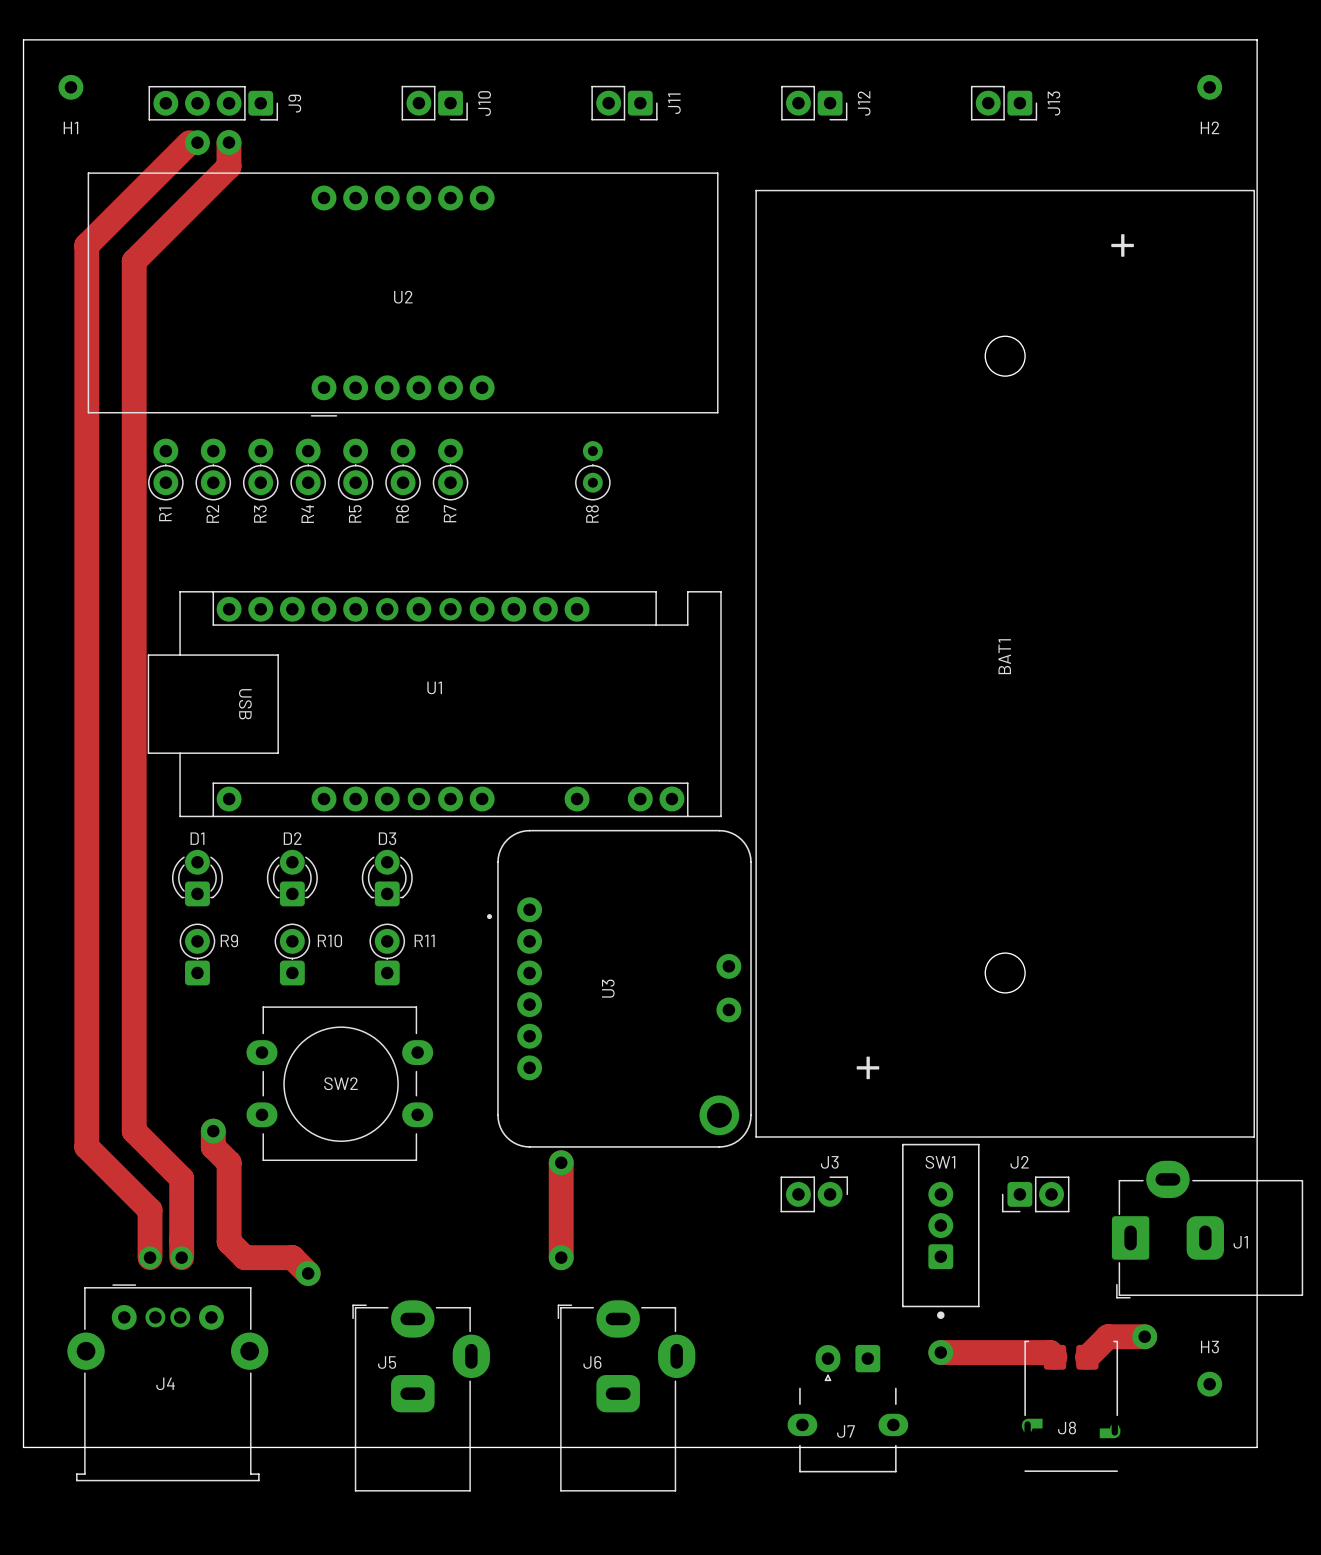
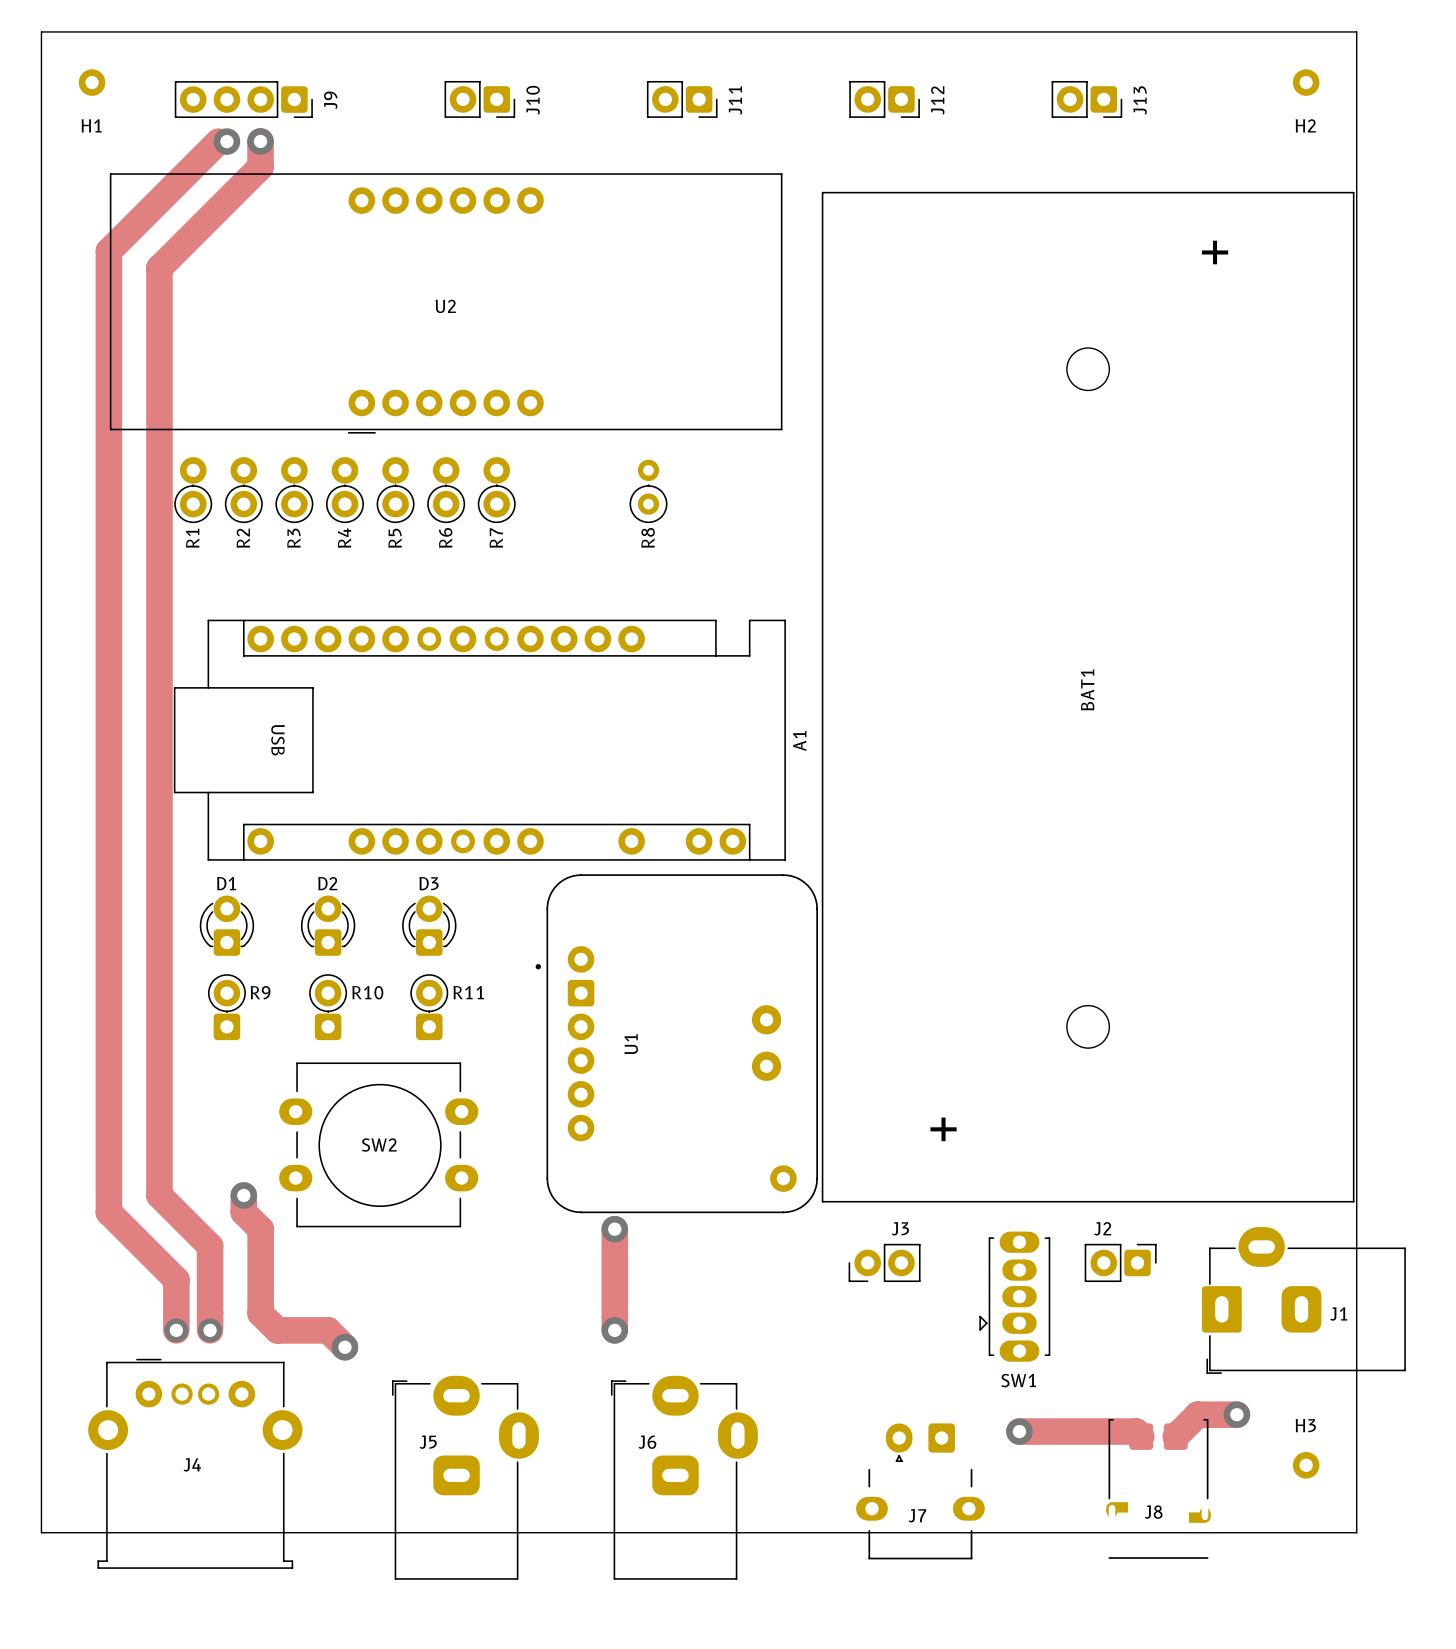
U1 name: U1 (434, 687) -> A1 (799, 741)
U3: (619, 988) -> none
U1: none -> (676, 1043)
SW1 footprint: [902, 1143, 980, 1319] -> [979, 1231, 1051, 1362]
SW1 name position: SW1 (940, 1162) -> SW1 (1018, 1380)
J3 rotation: 0° (814, 1194) -> 180° (884, 1262)
J2 rotation: 0° (1035, 1194) -> 180° (1120, 1262)

